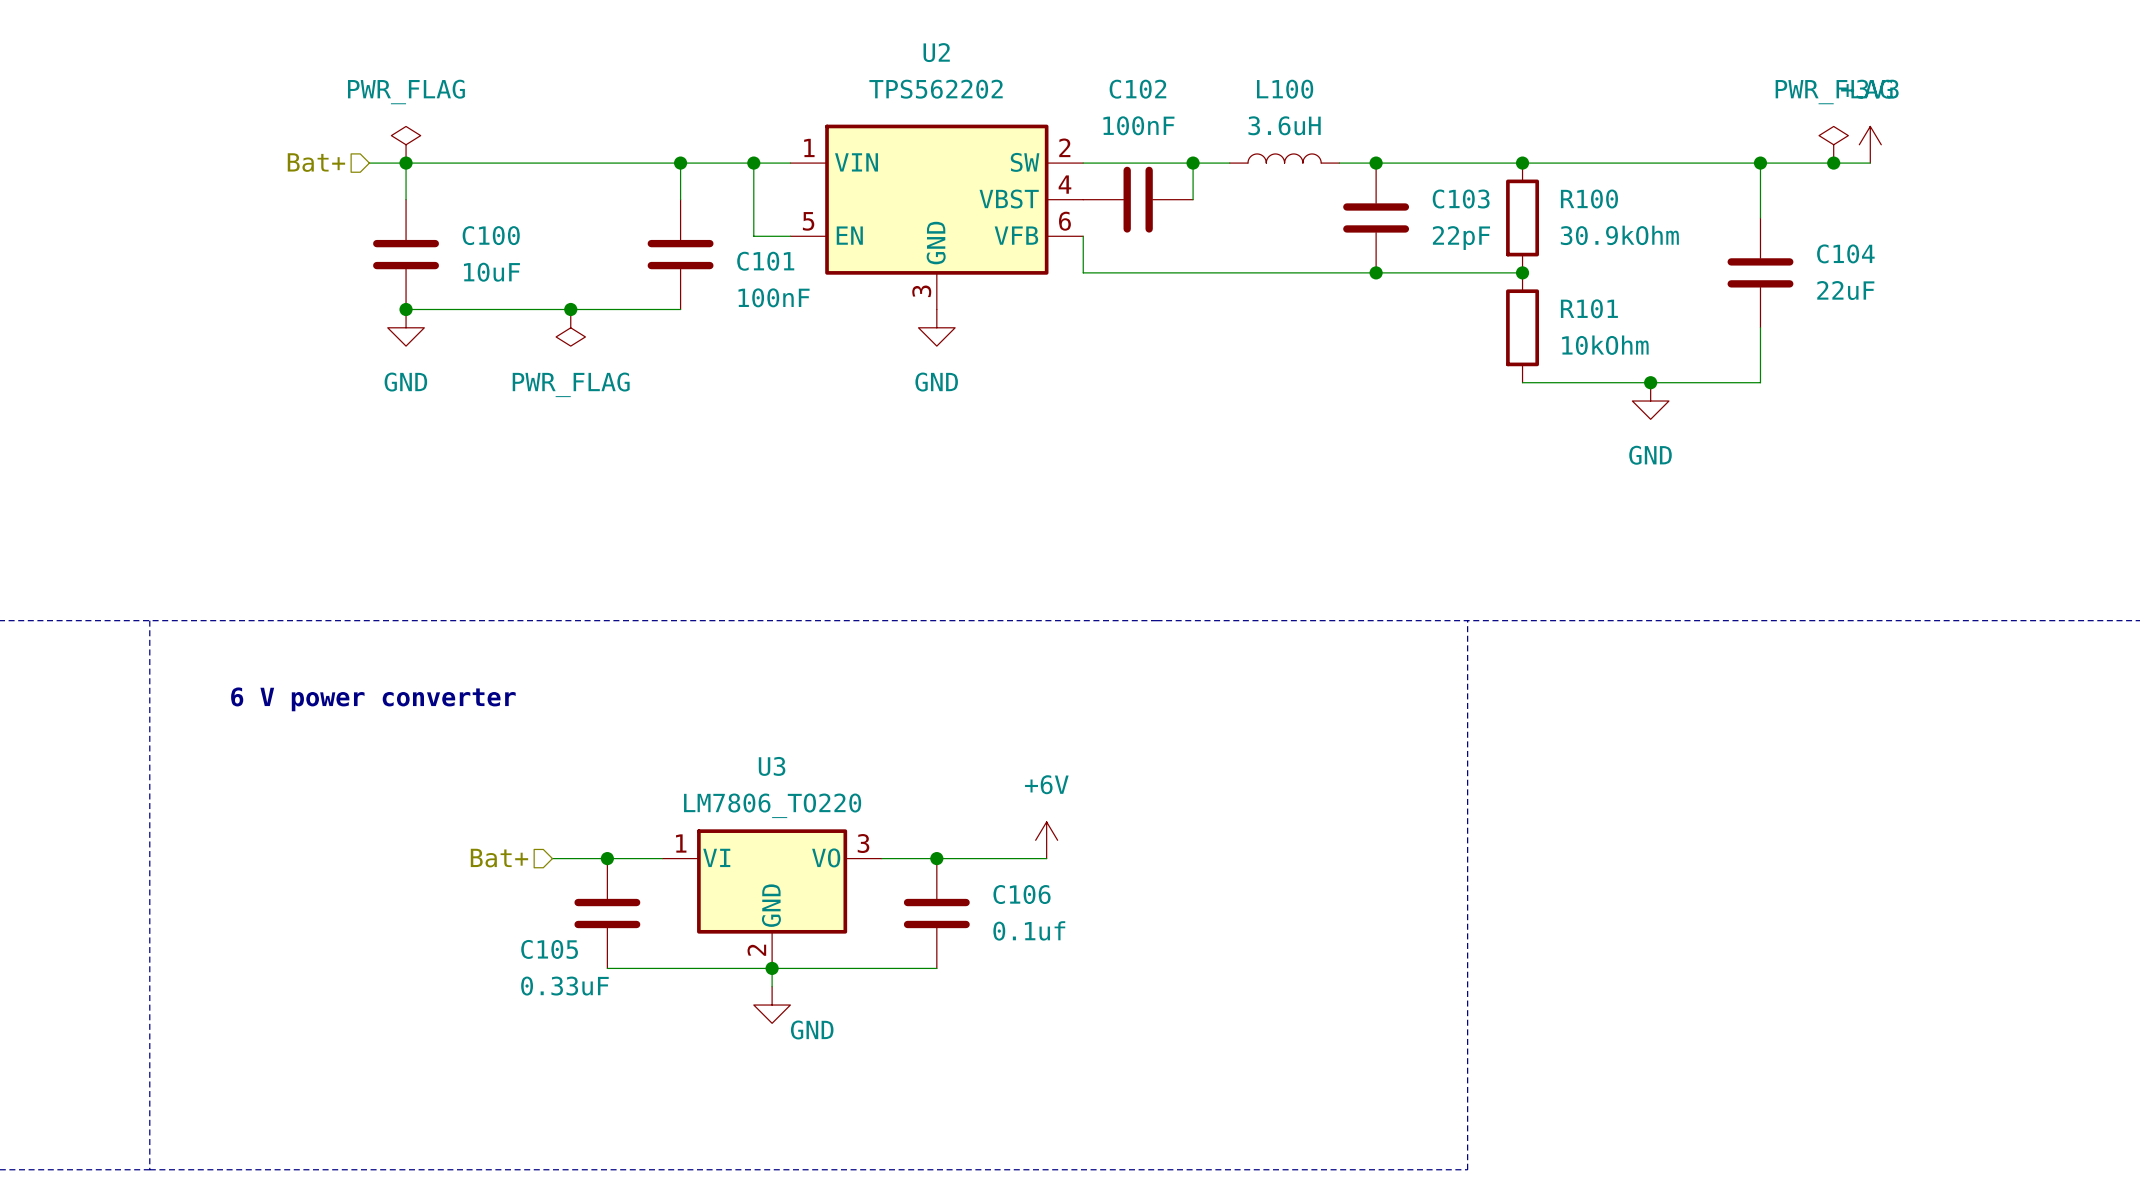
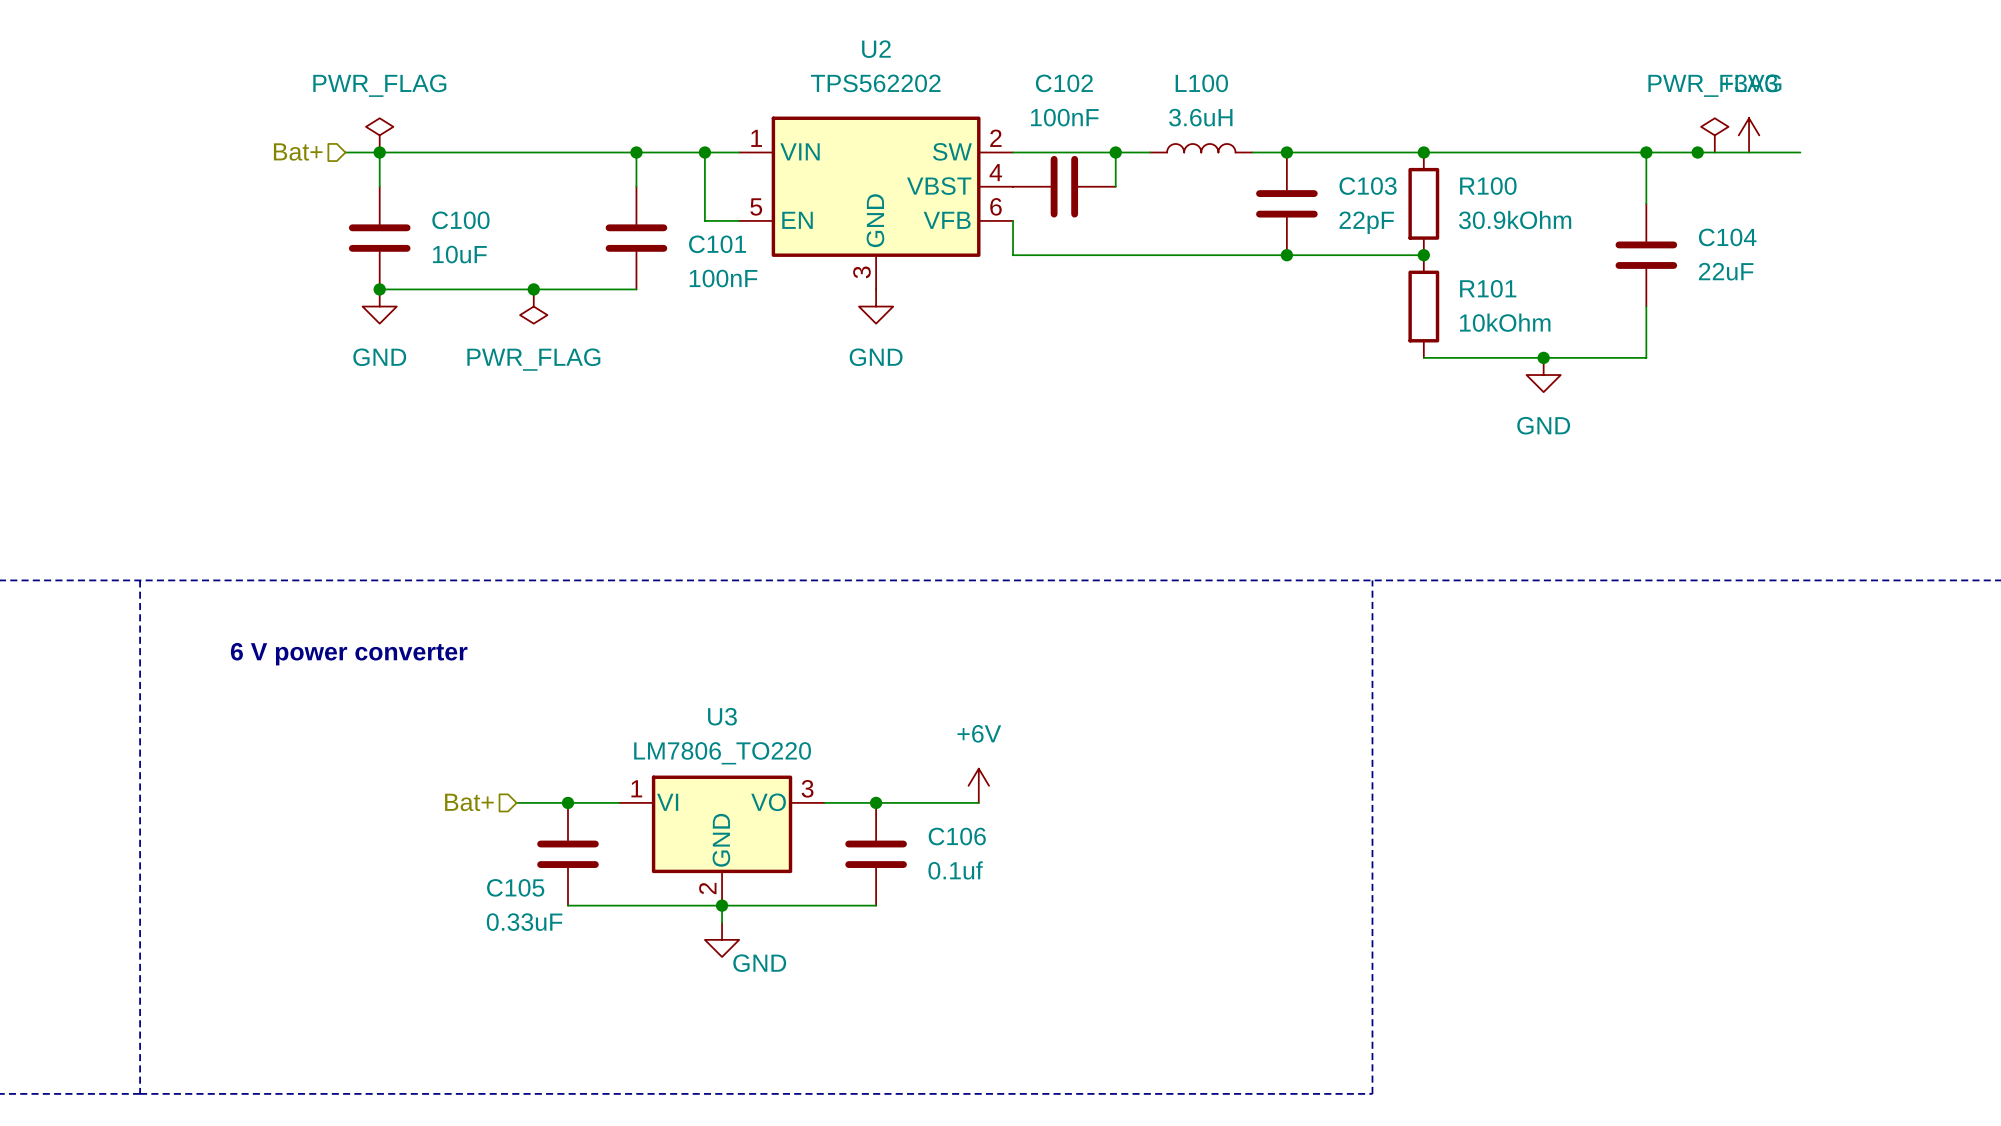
junction position: (1833, 163) -> (1697, 152)
wire: none -> (1749, 152) (1800, 152)

